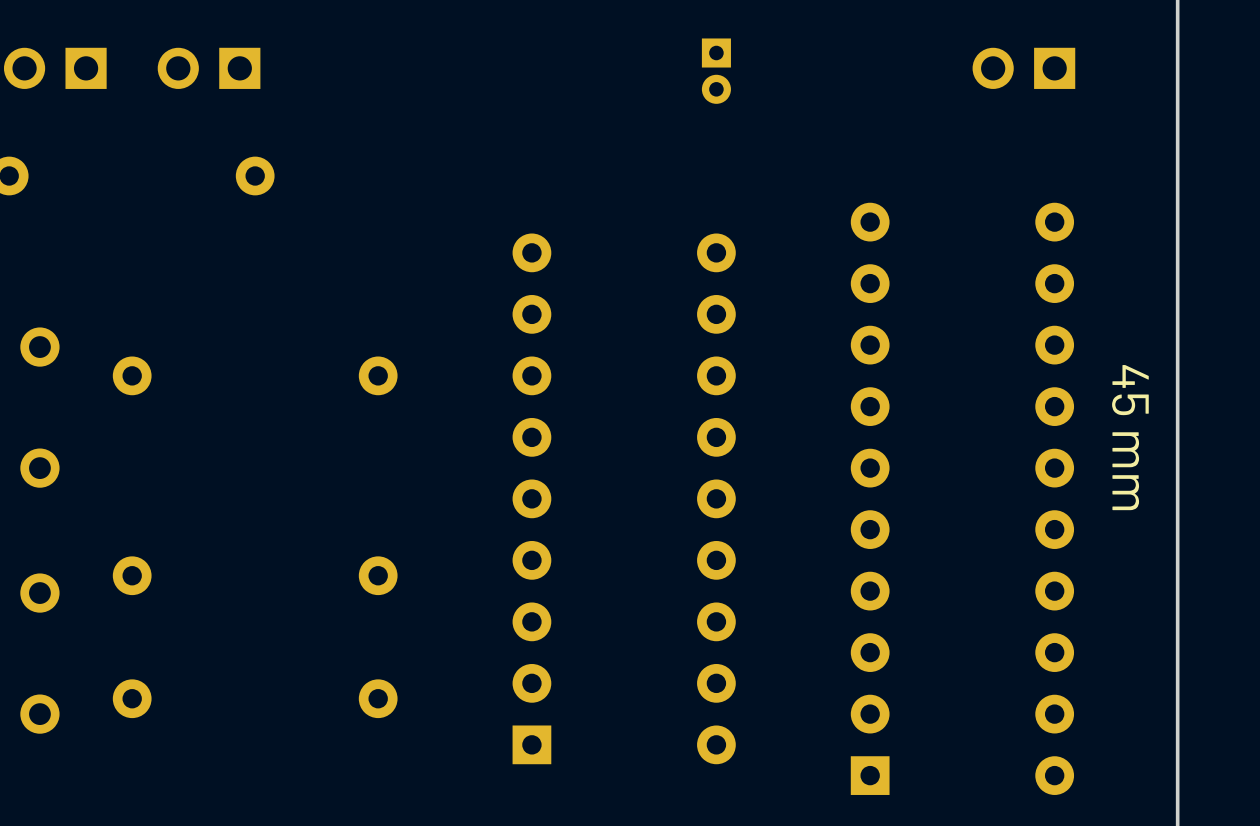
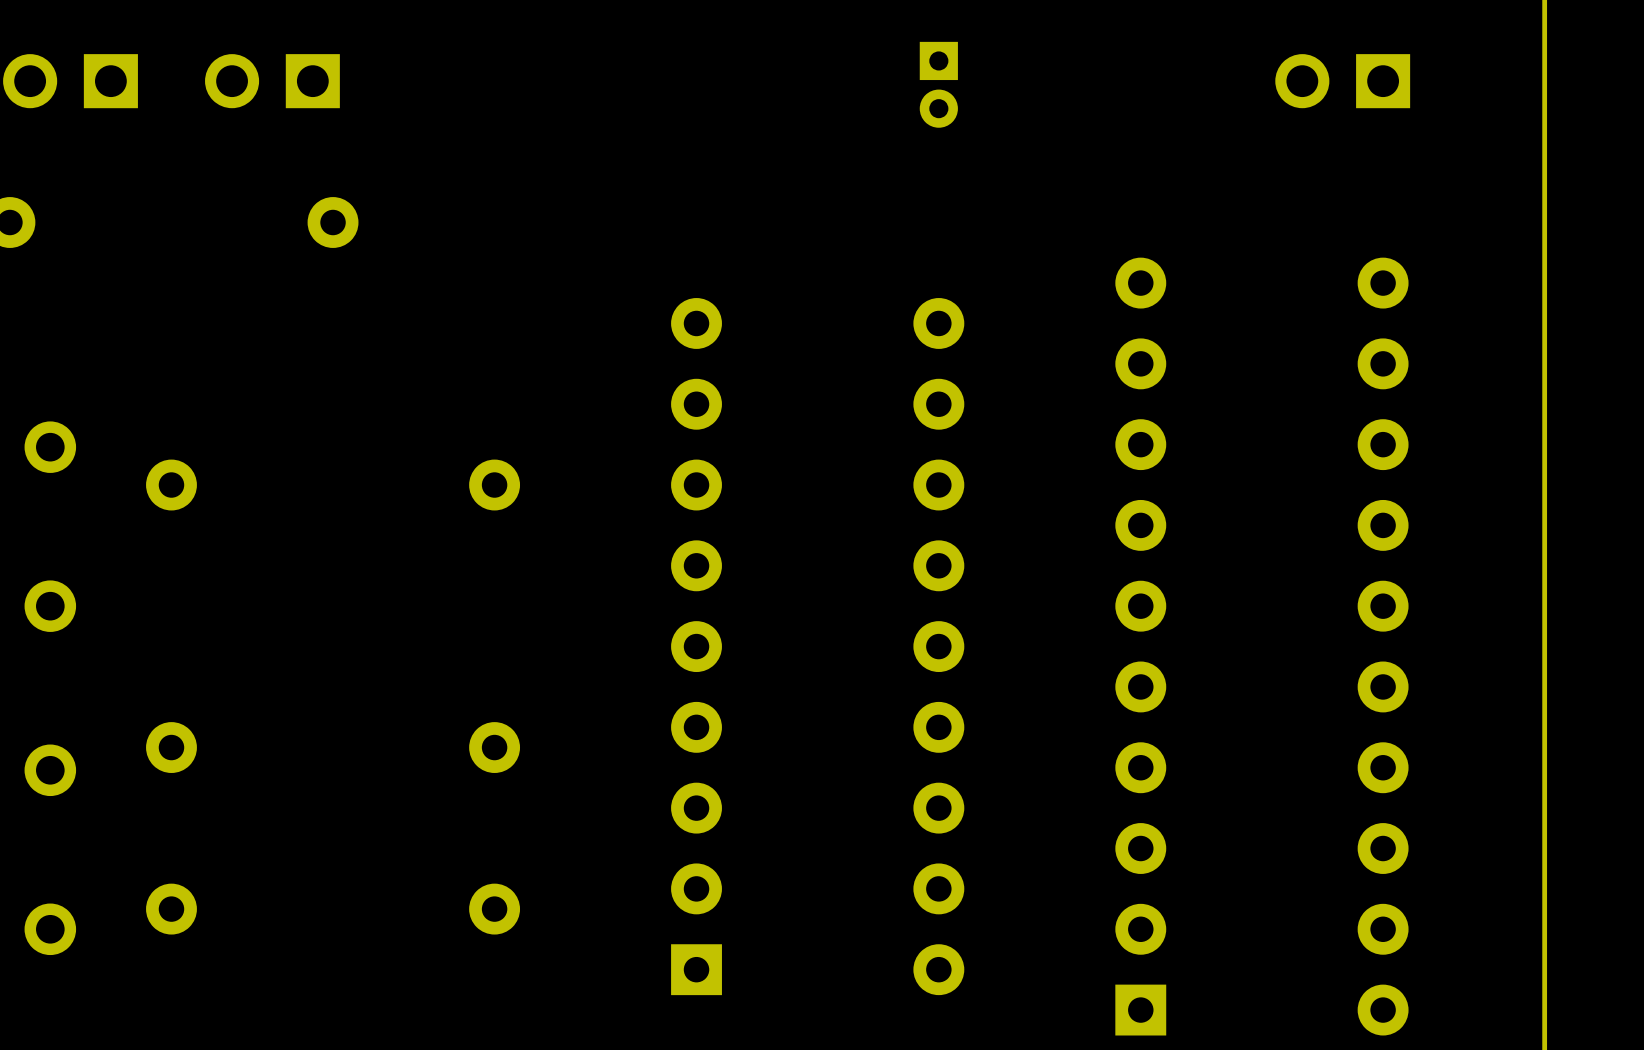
text: 45 mm (1130, 437) -> none

